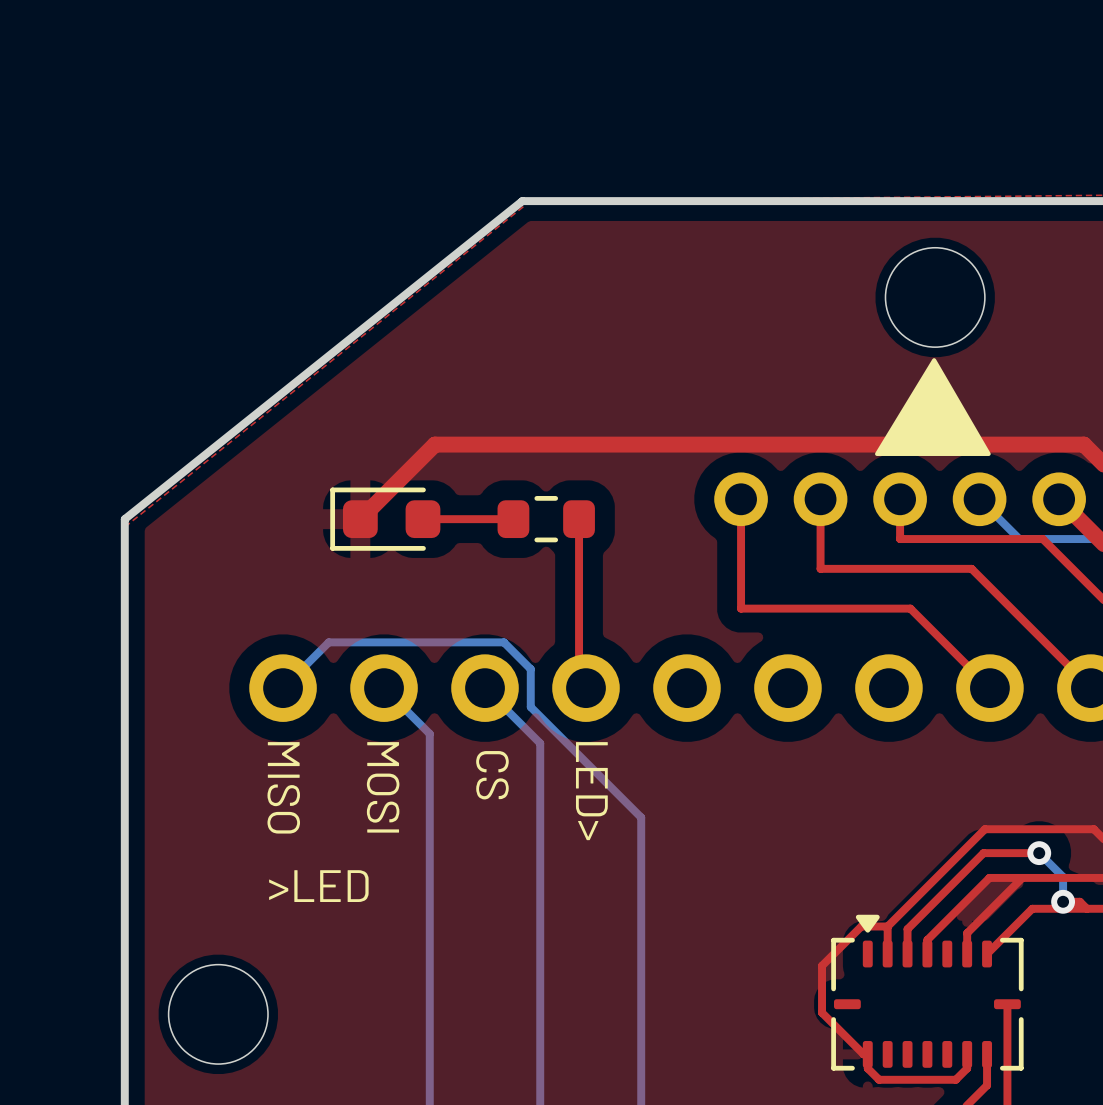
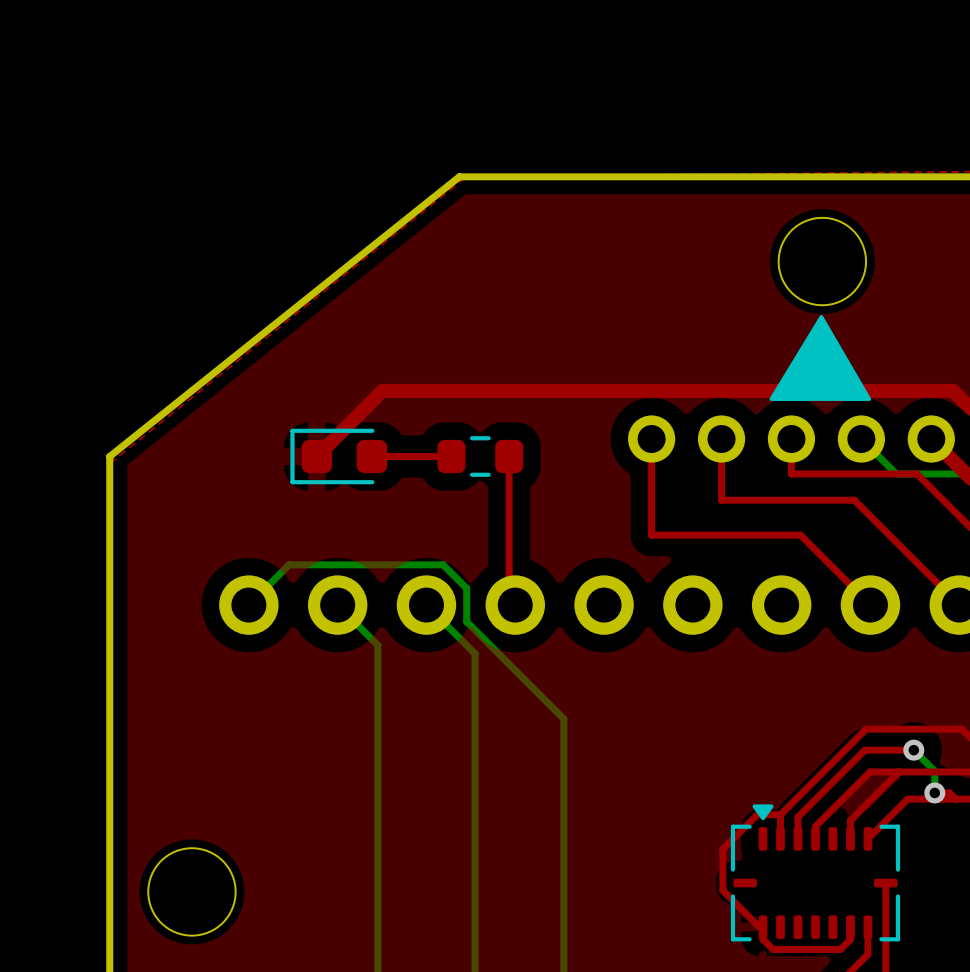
text: CS (492, 775) -> none
text: MISO (283, 787) -> none
text: MOSI (383, 787) -> none
text: LED> (591, 791) -> none
text: >LED (318, 886) -> none

